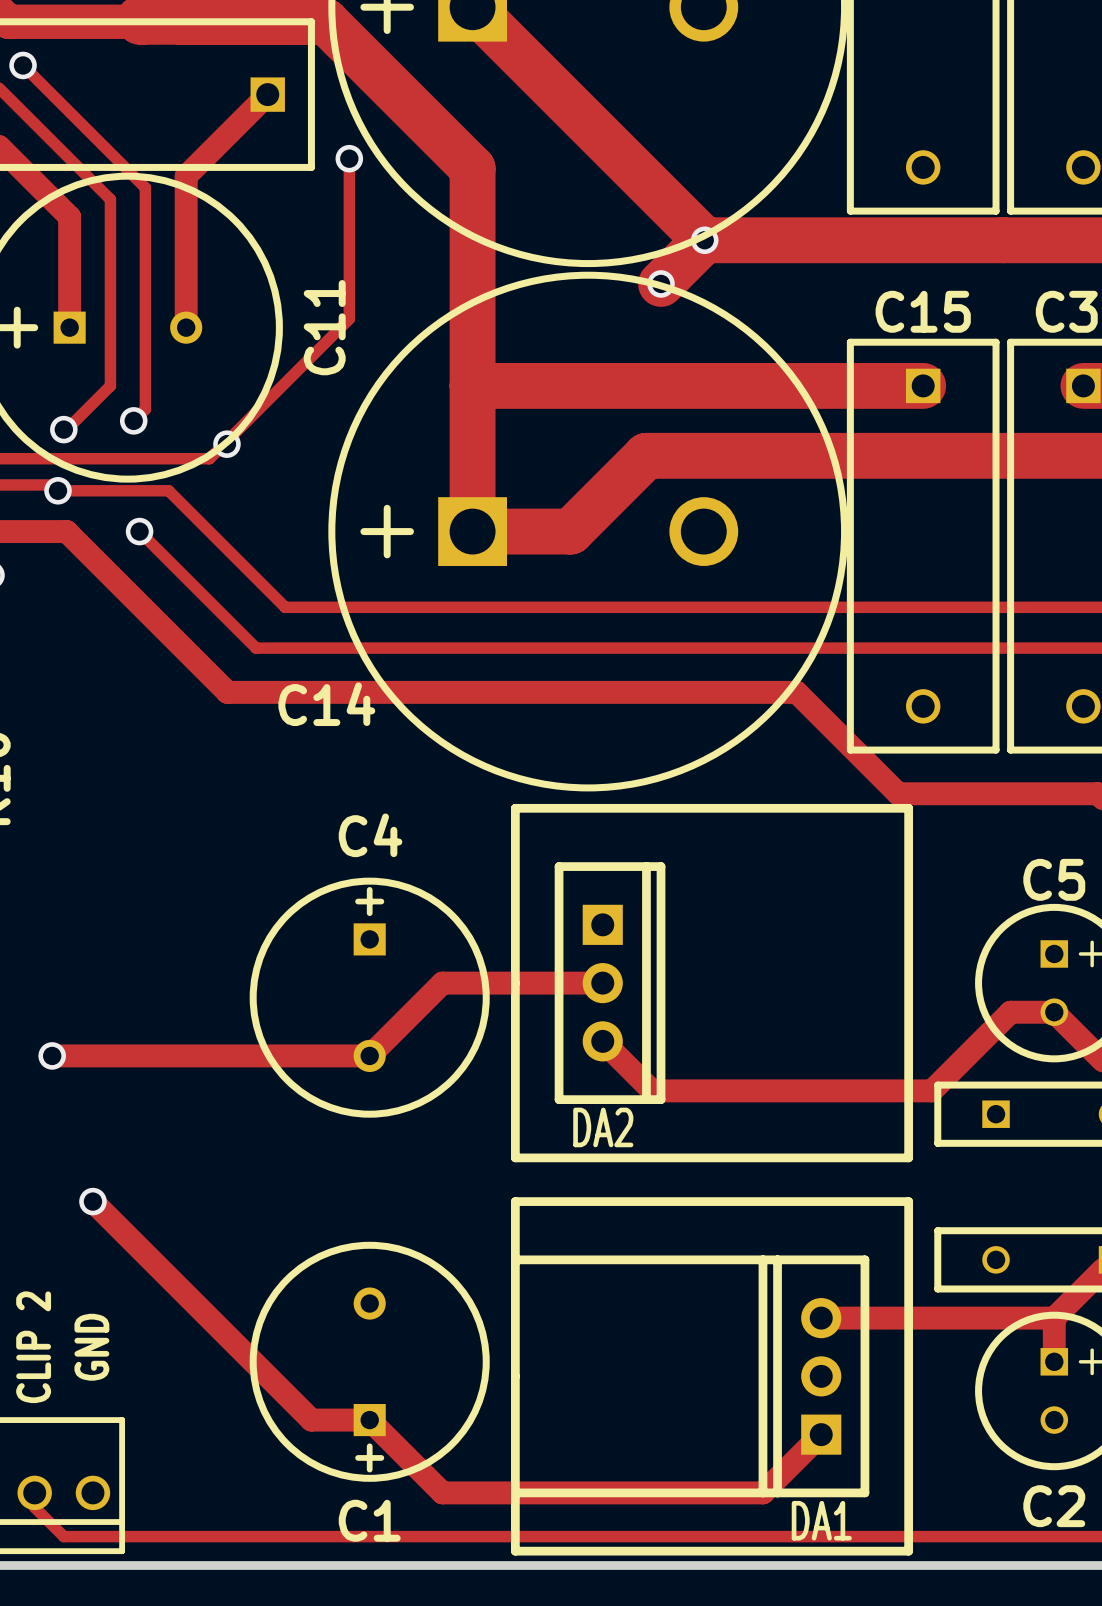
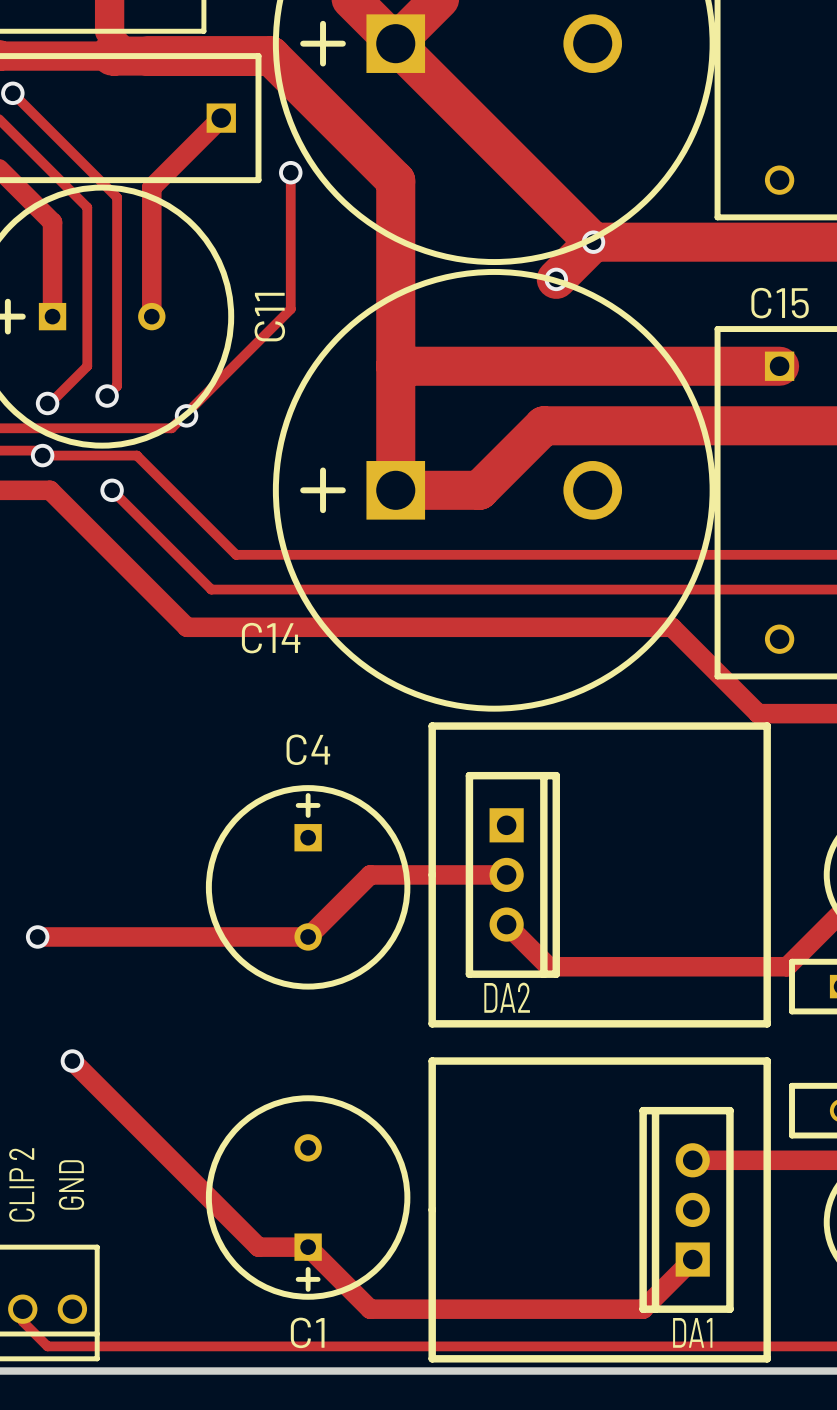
line: (515, 1259) (762, 1259) -> none
line: (515, 1492) (762, 1492) -> none

